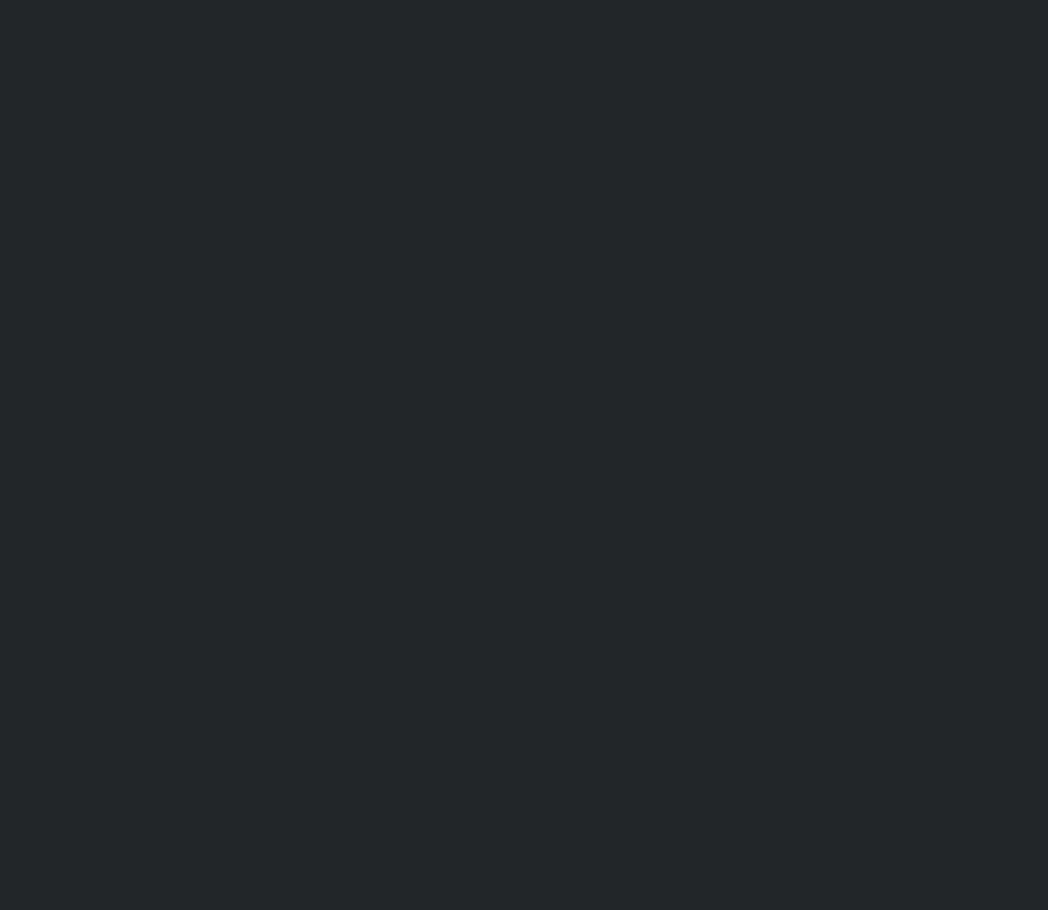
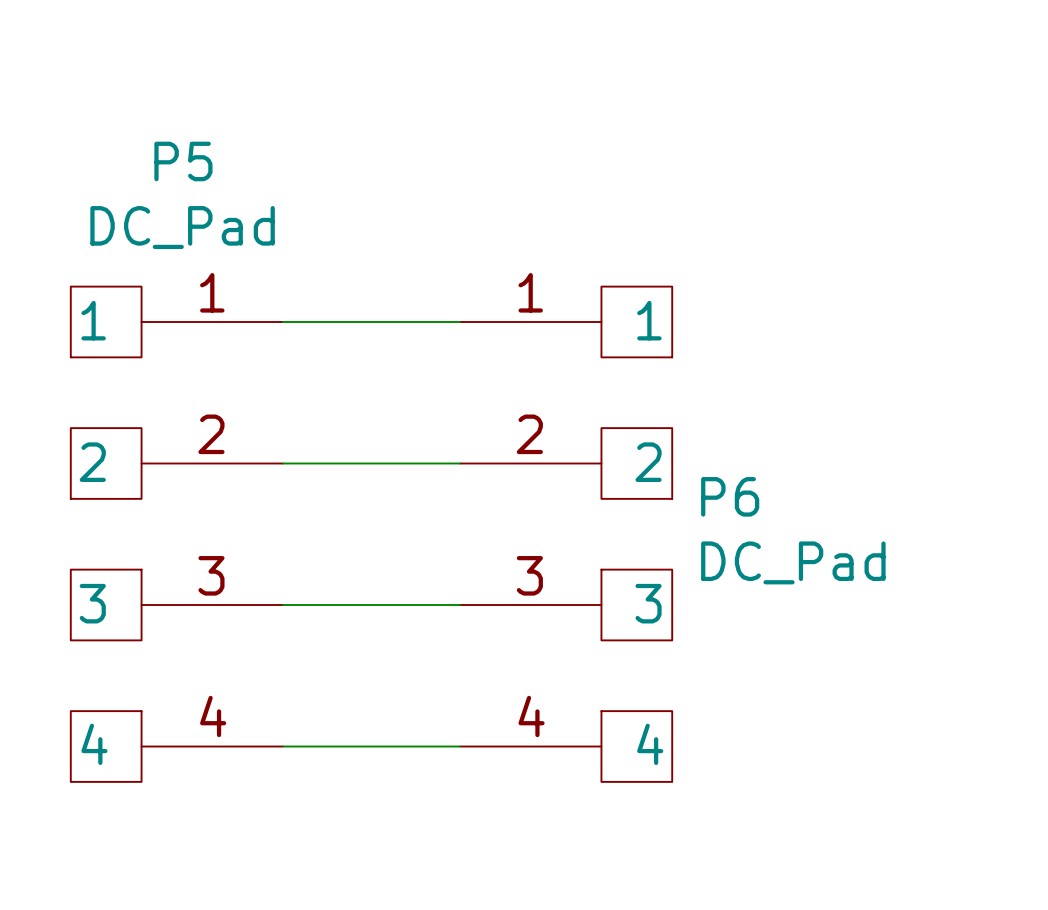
wire: none -> (283, 321) (459, 321)
wire: none -> (283, 463) (459, 463)
P5: none -> DC_Pad (176, 534)
P6: none -> DC_Pad (566, 534)
wire: none -> (283, 605) (459, 605)
wire: none -> (283, 746) (459, 746)

